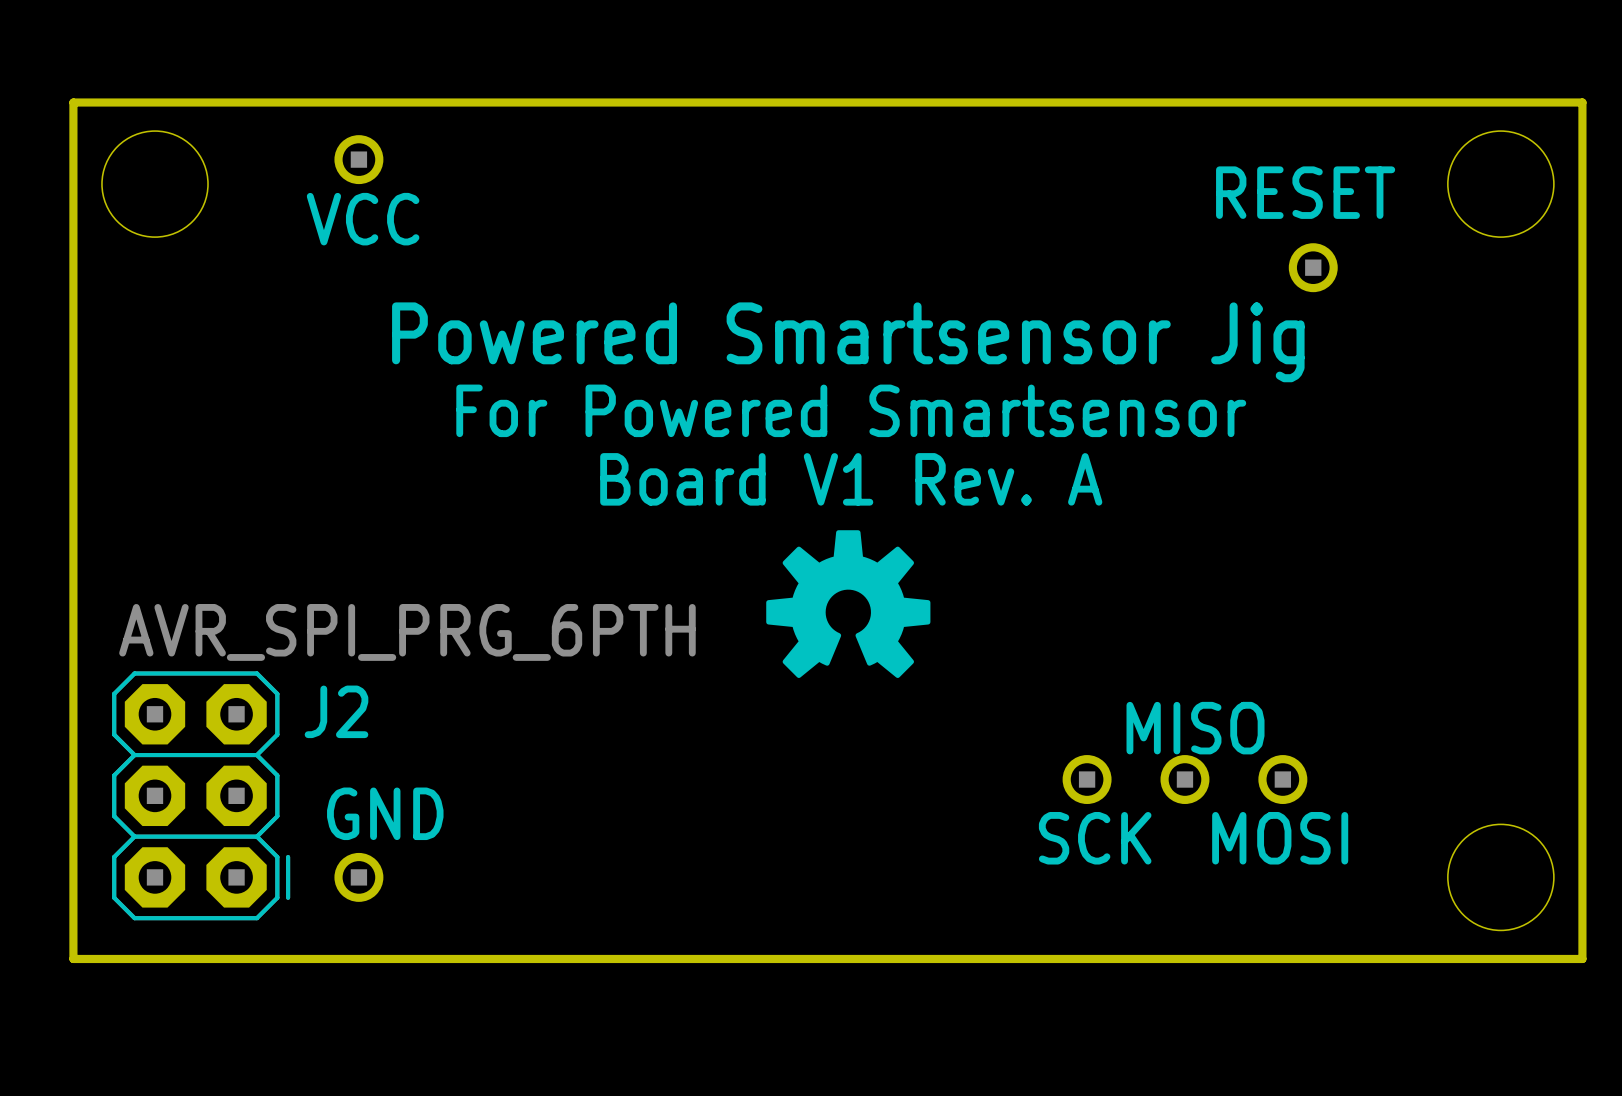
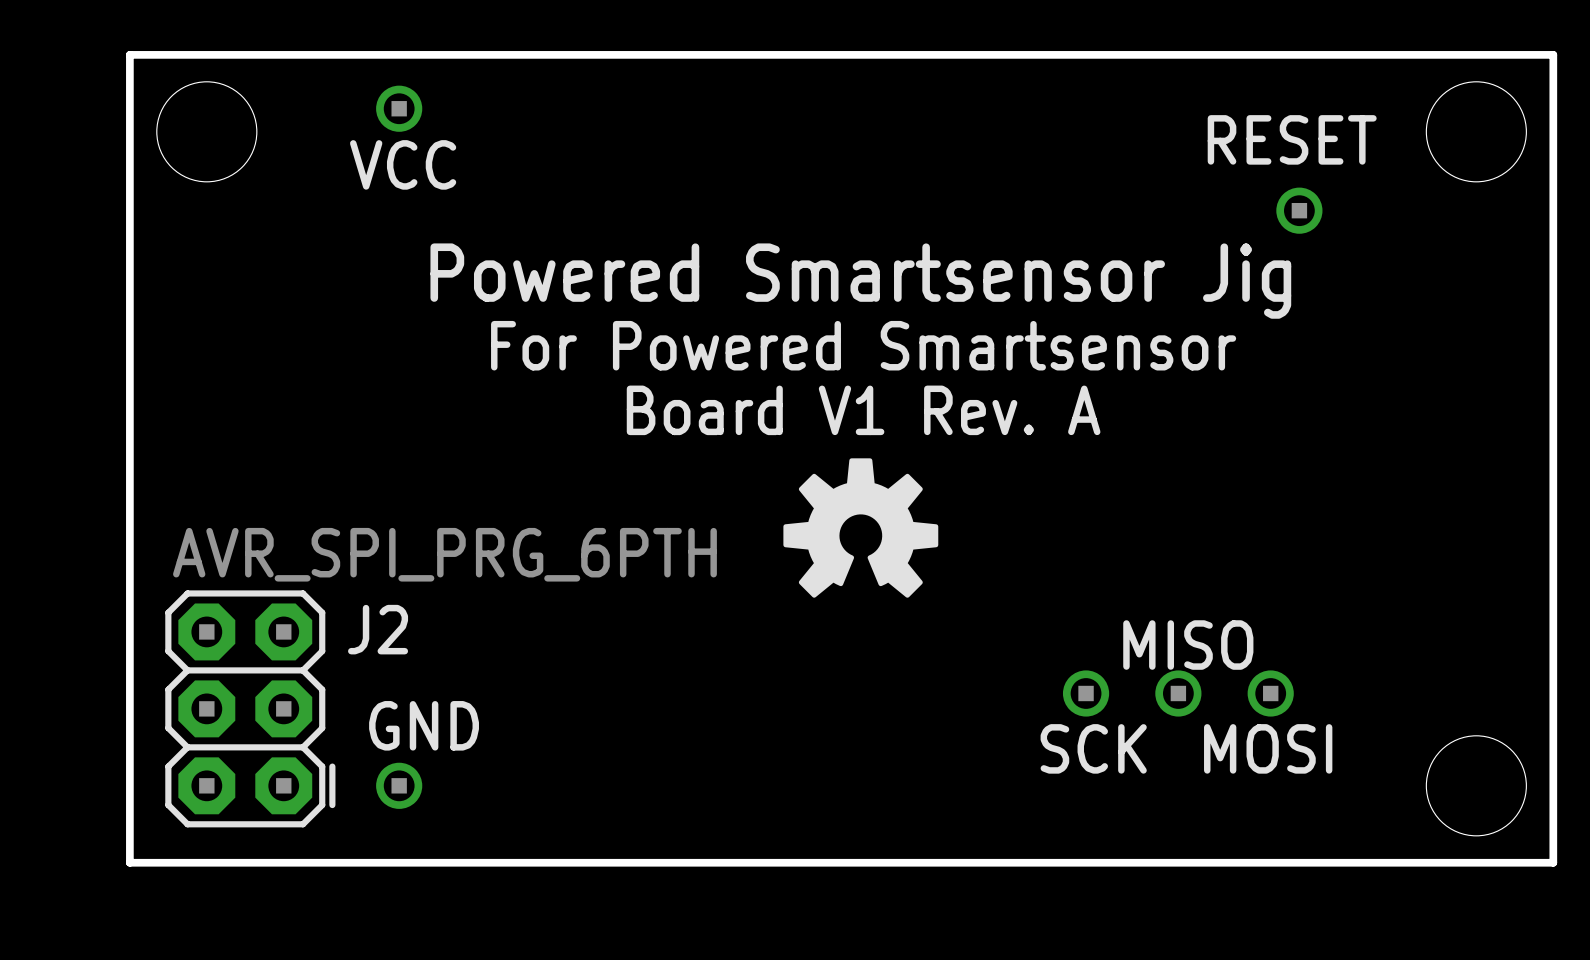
J2 footprint: [112, 671, 291, 921] -> [165, 590, 336, 828]

